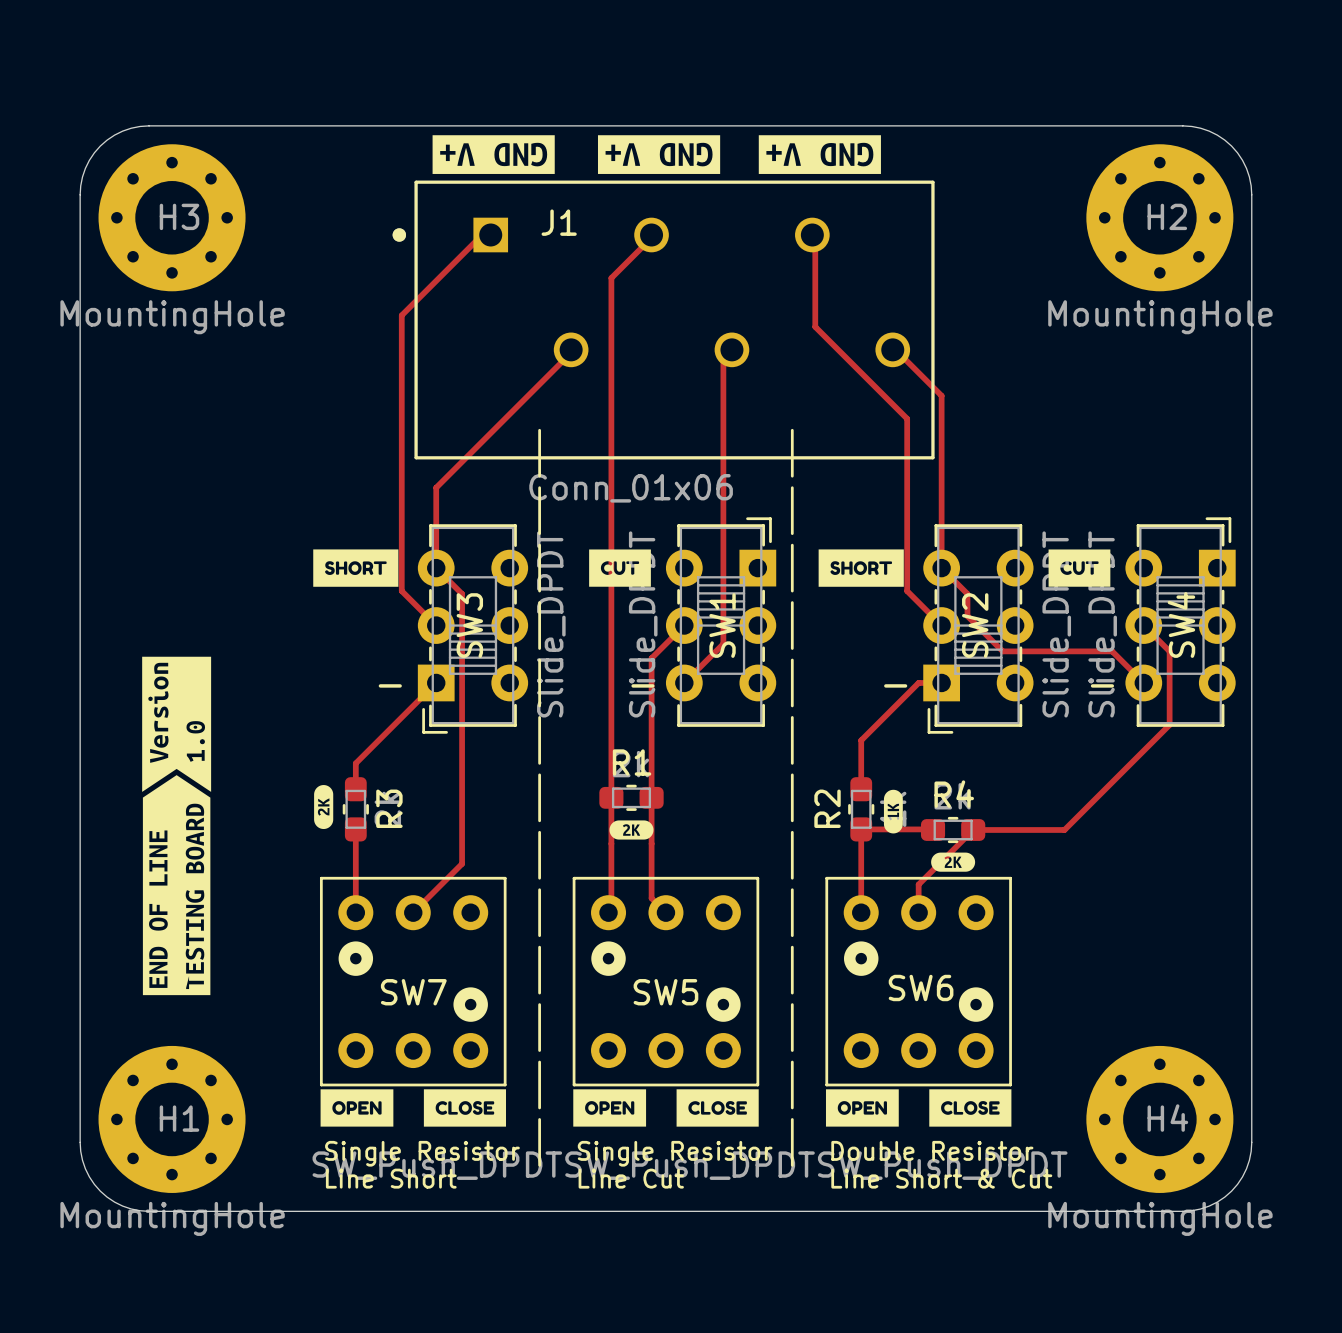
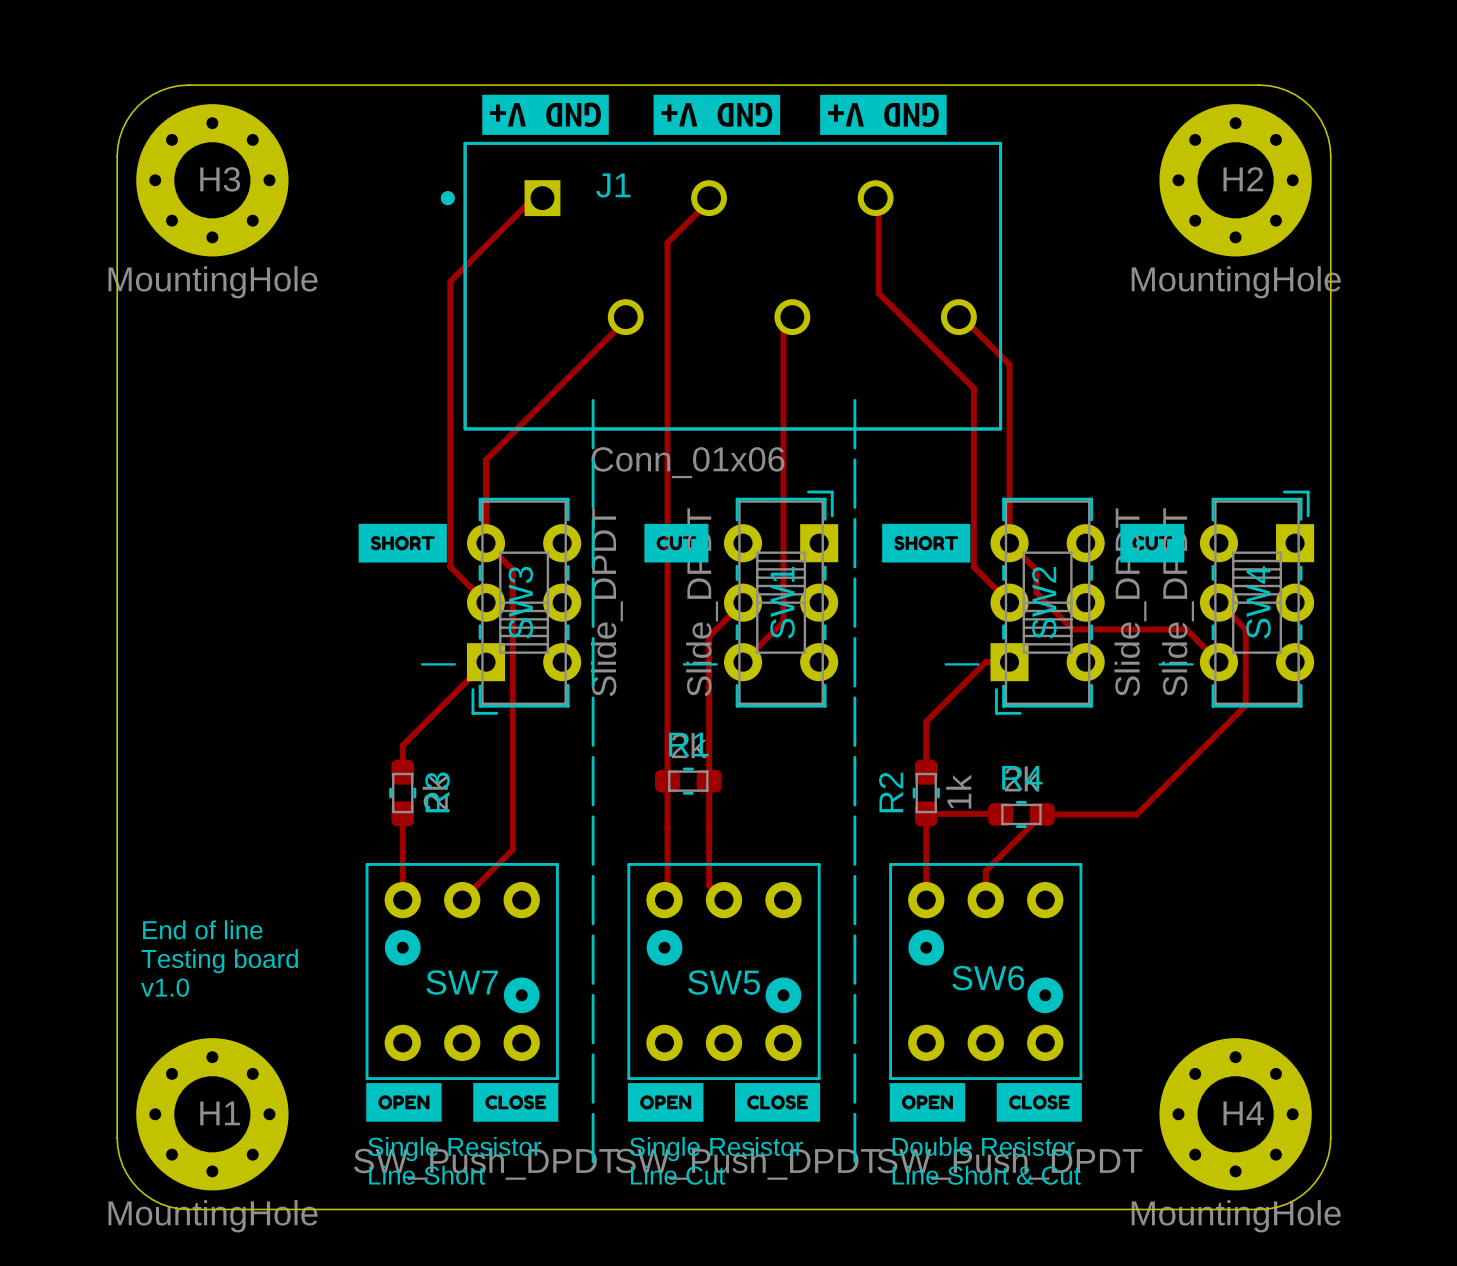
drawing: [142, 656, 212, 996] -> none
drawing: [314, 785, 334, 830] -> none
drawing: [883, 789, 903, 834] -> none
drawing: [609, 820, 654, 840] -> none
drawing: [931, 852, 976, 872] -> none
text: none -> End of line (202, 929)
text: none -> Testing board (219, 961)
text: none -> v1.0 (165, 987)

